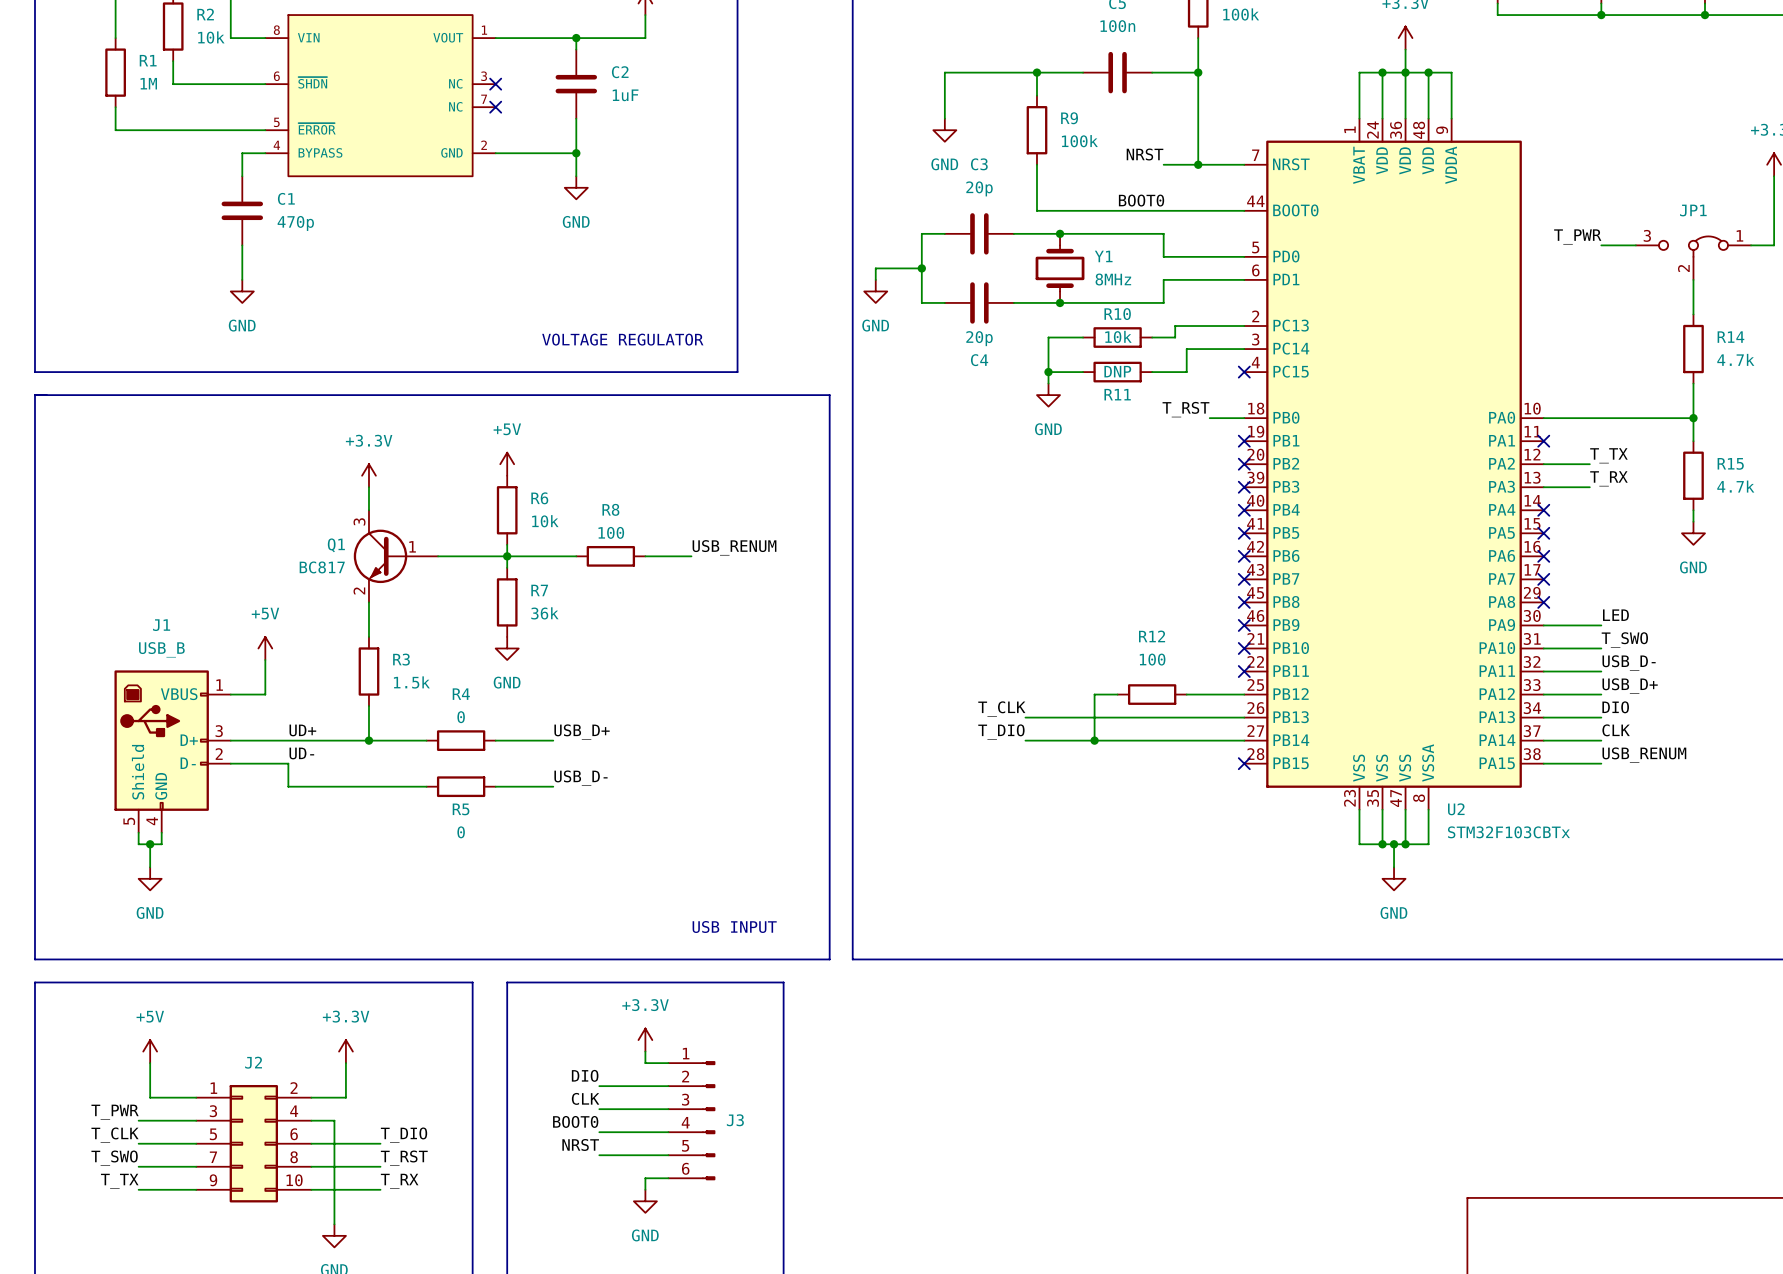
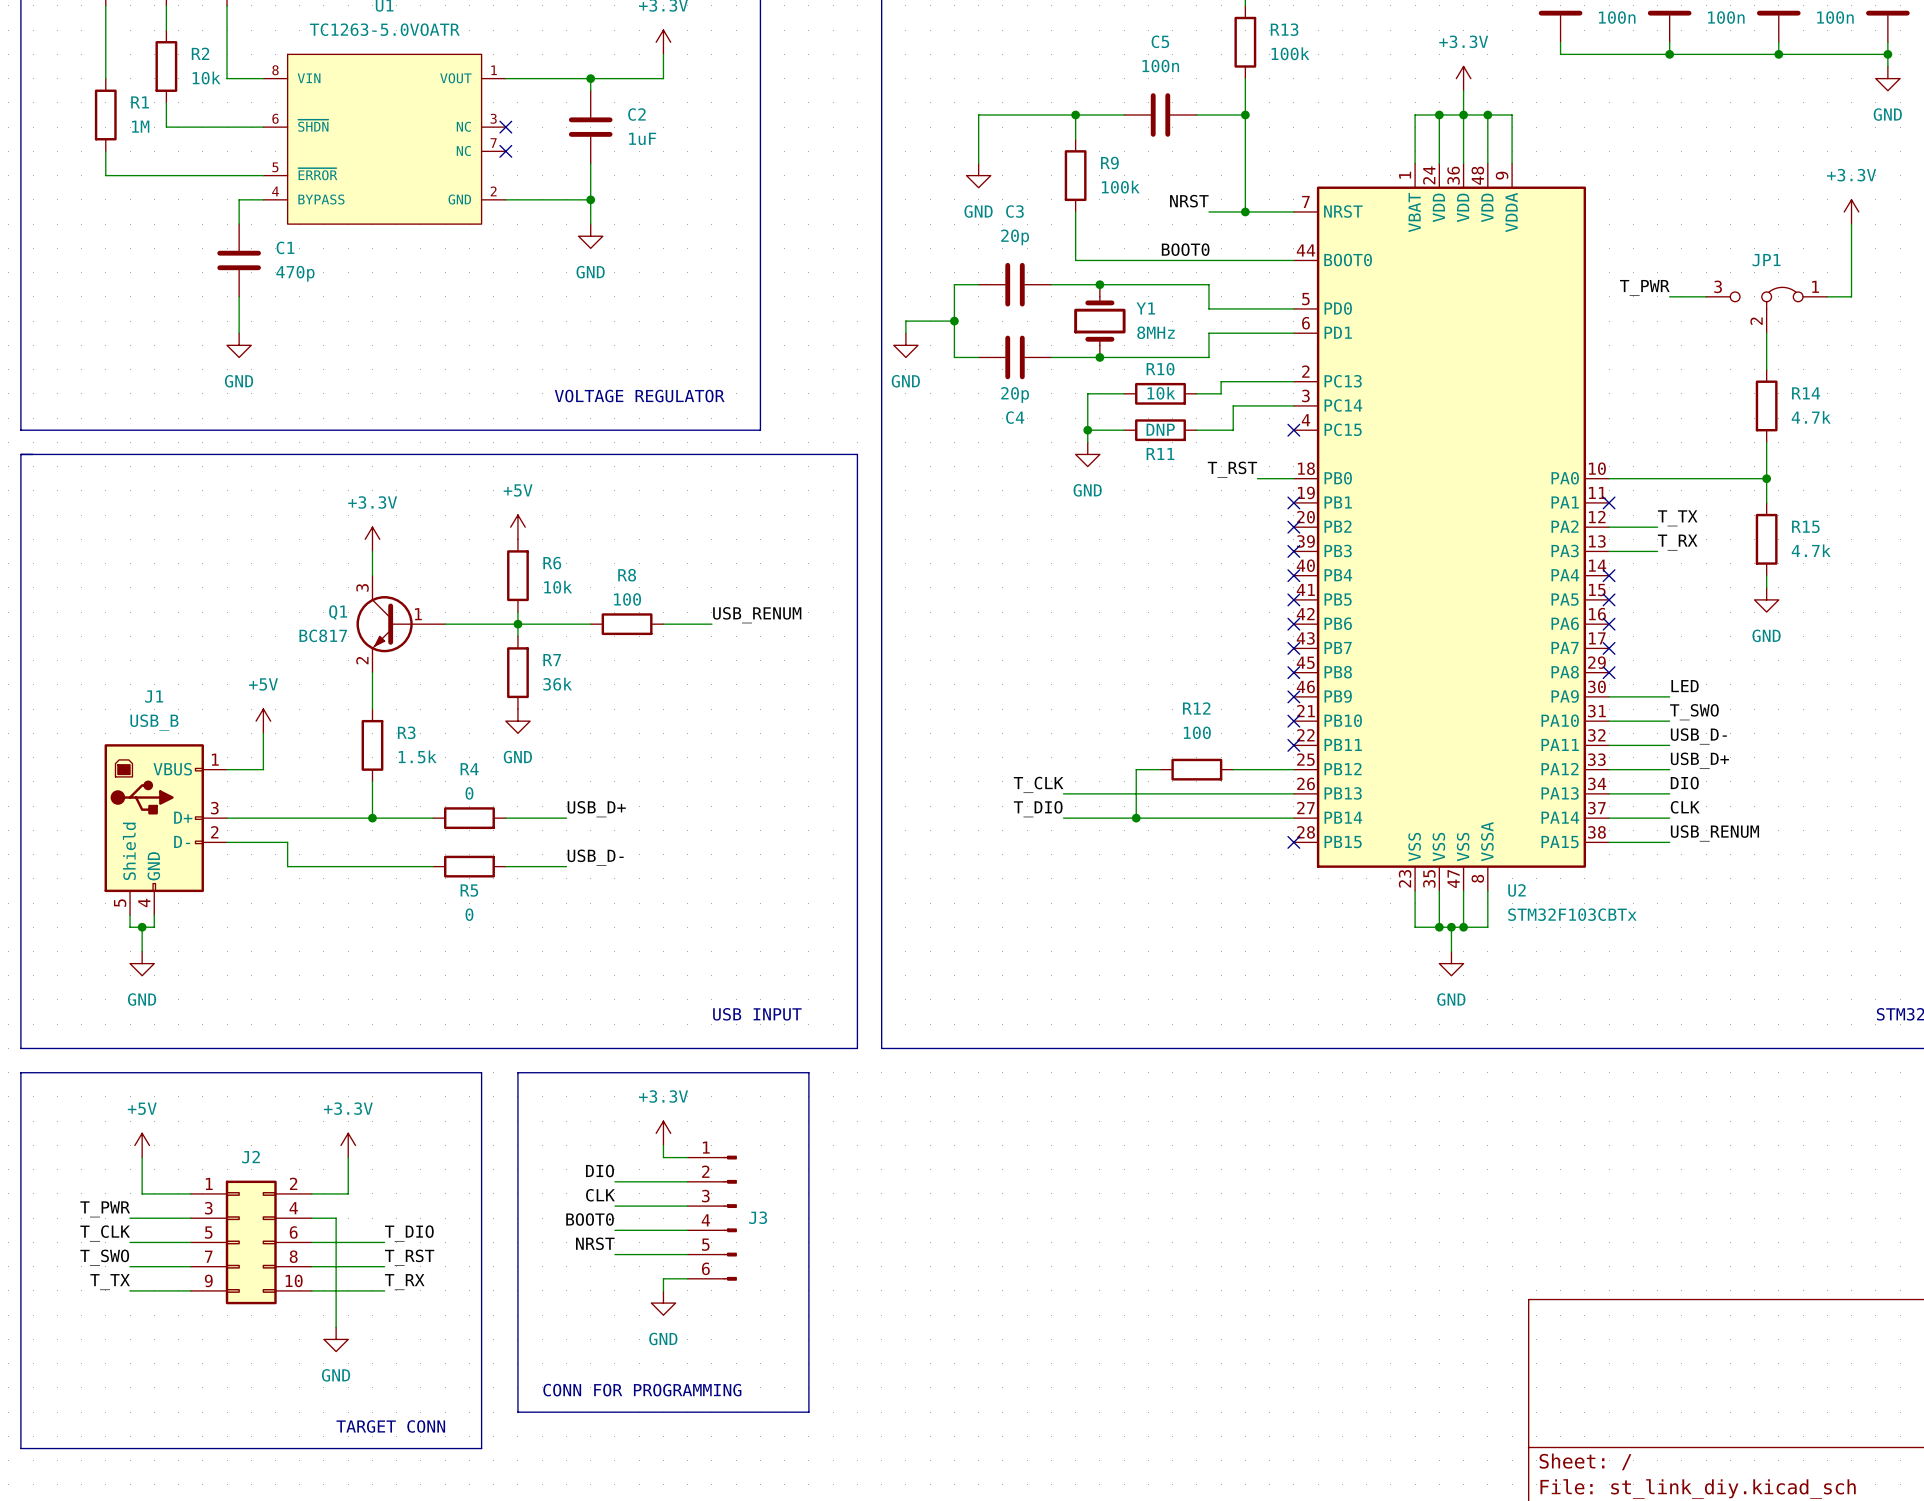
label: UD+ (302, 730) -> none
label: UD- (301, 753) -> none

